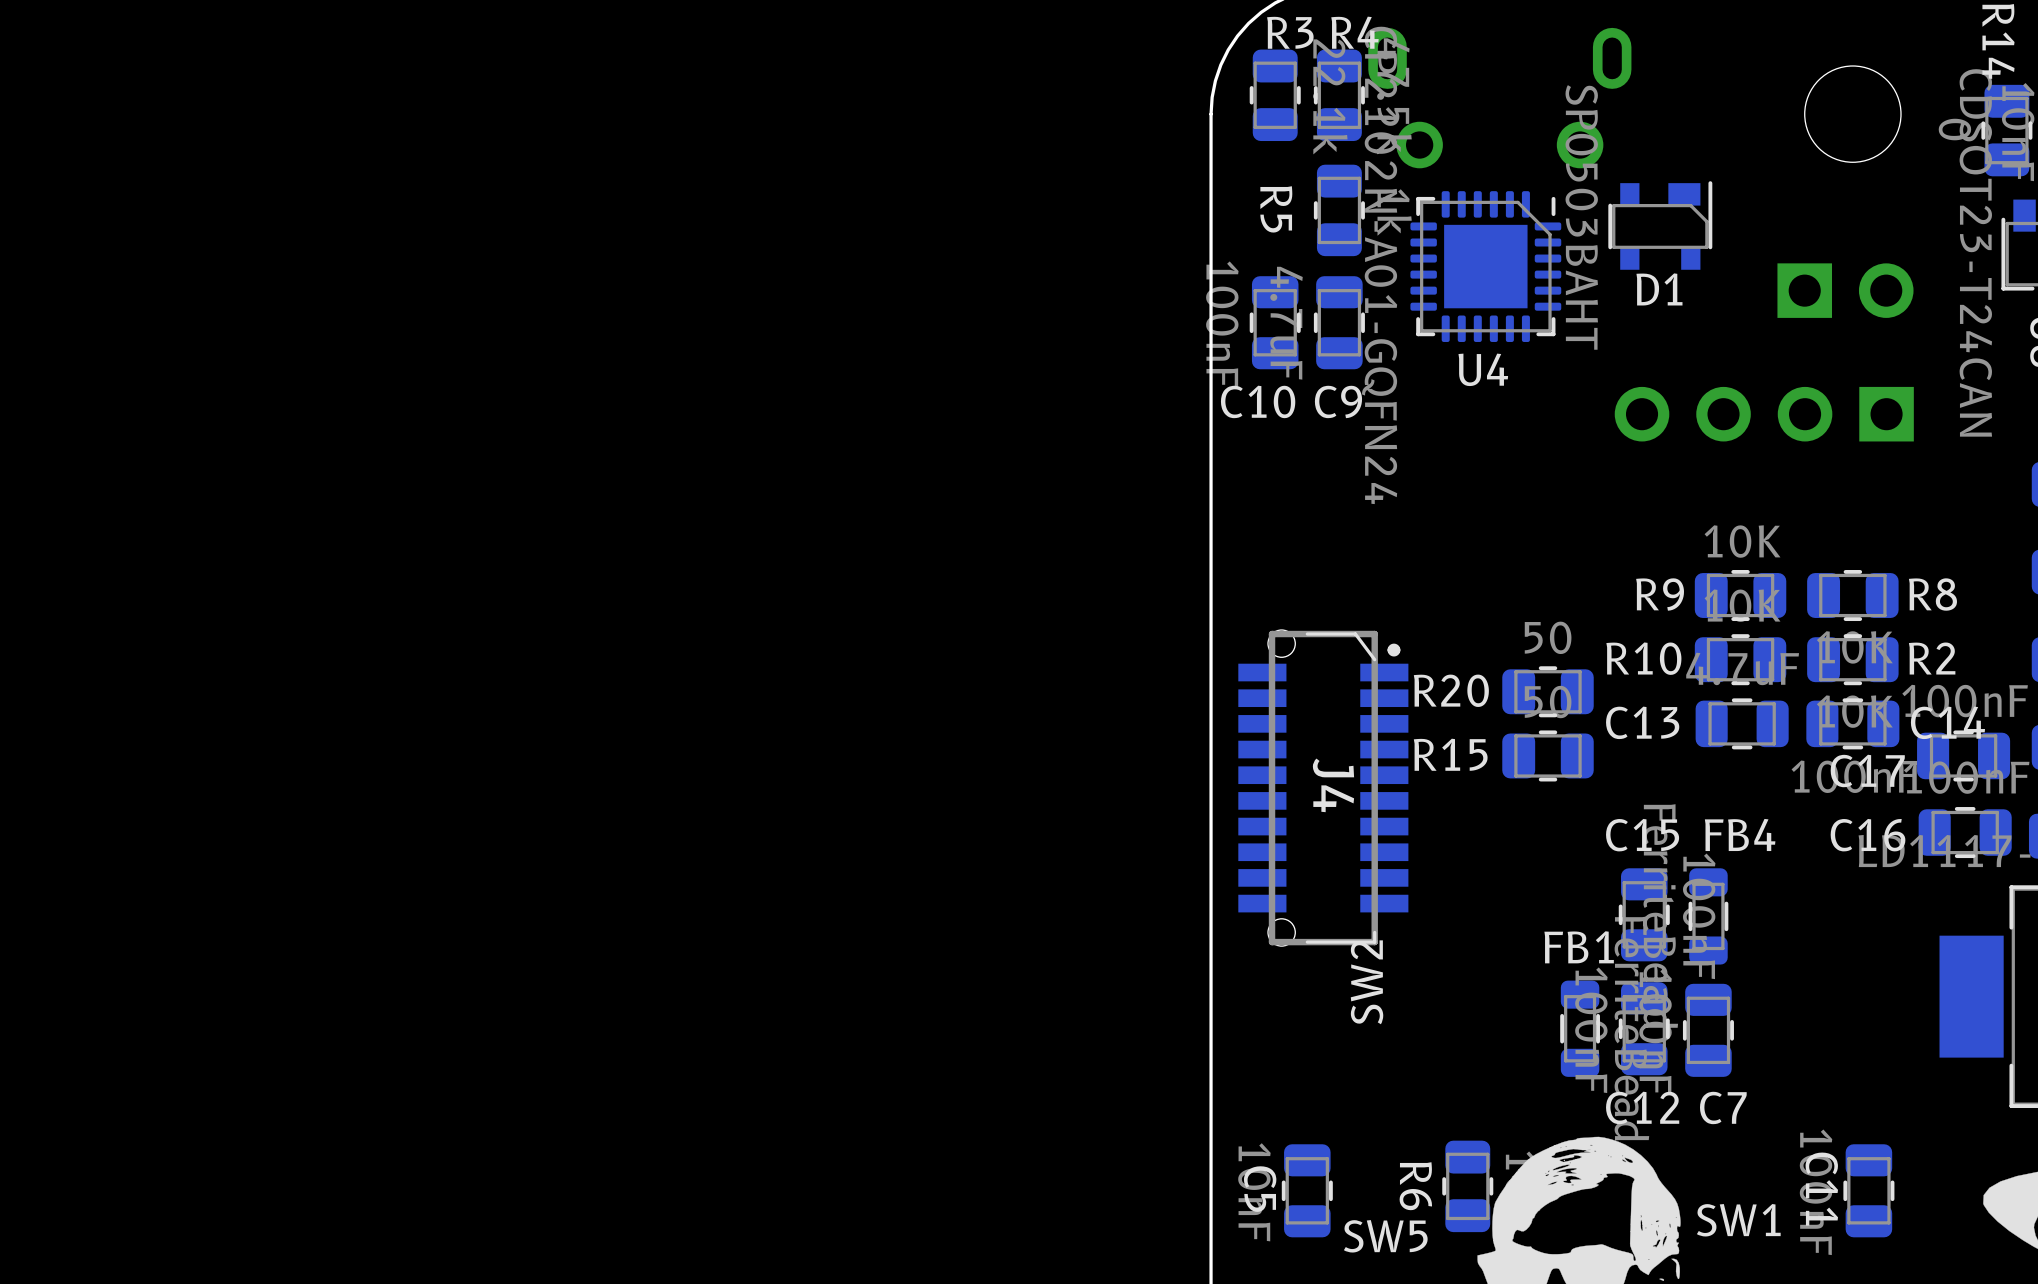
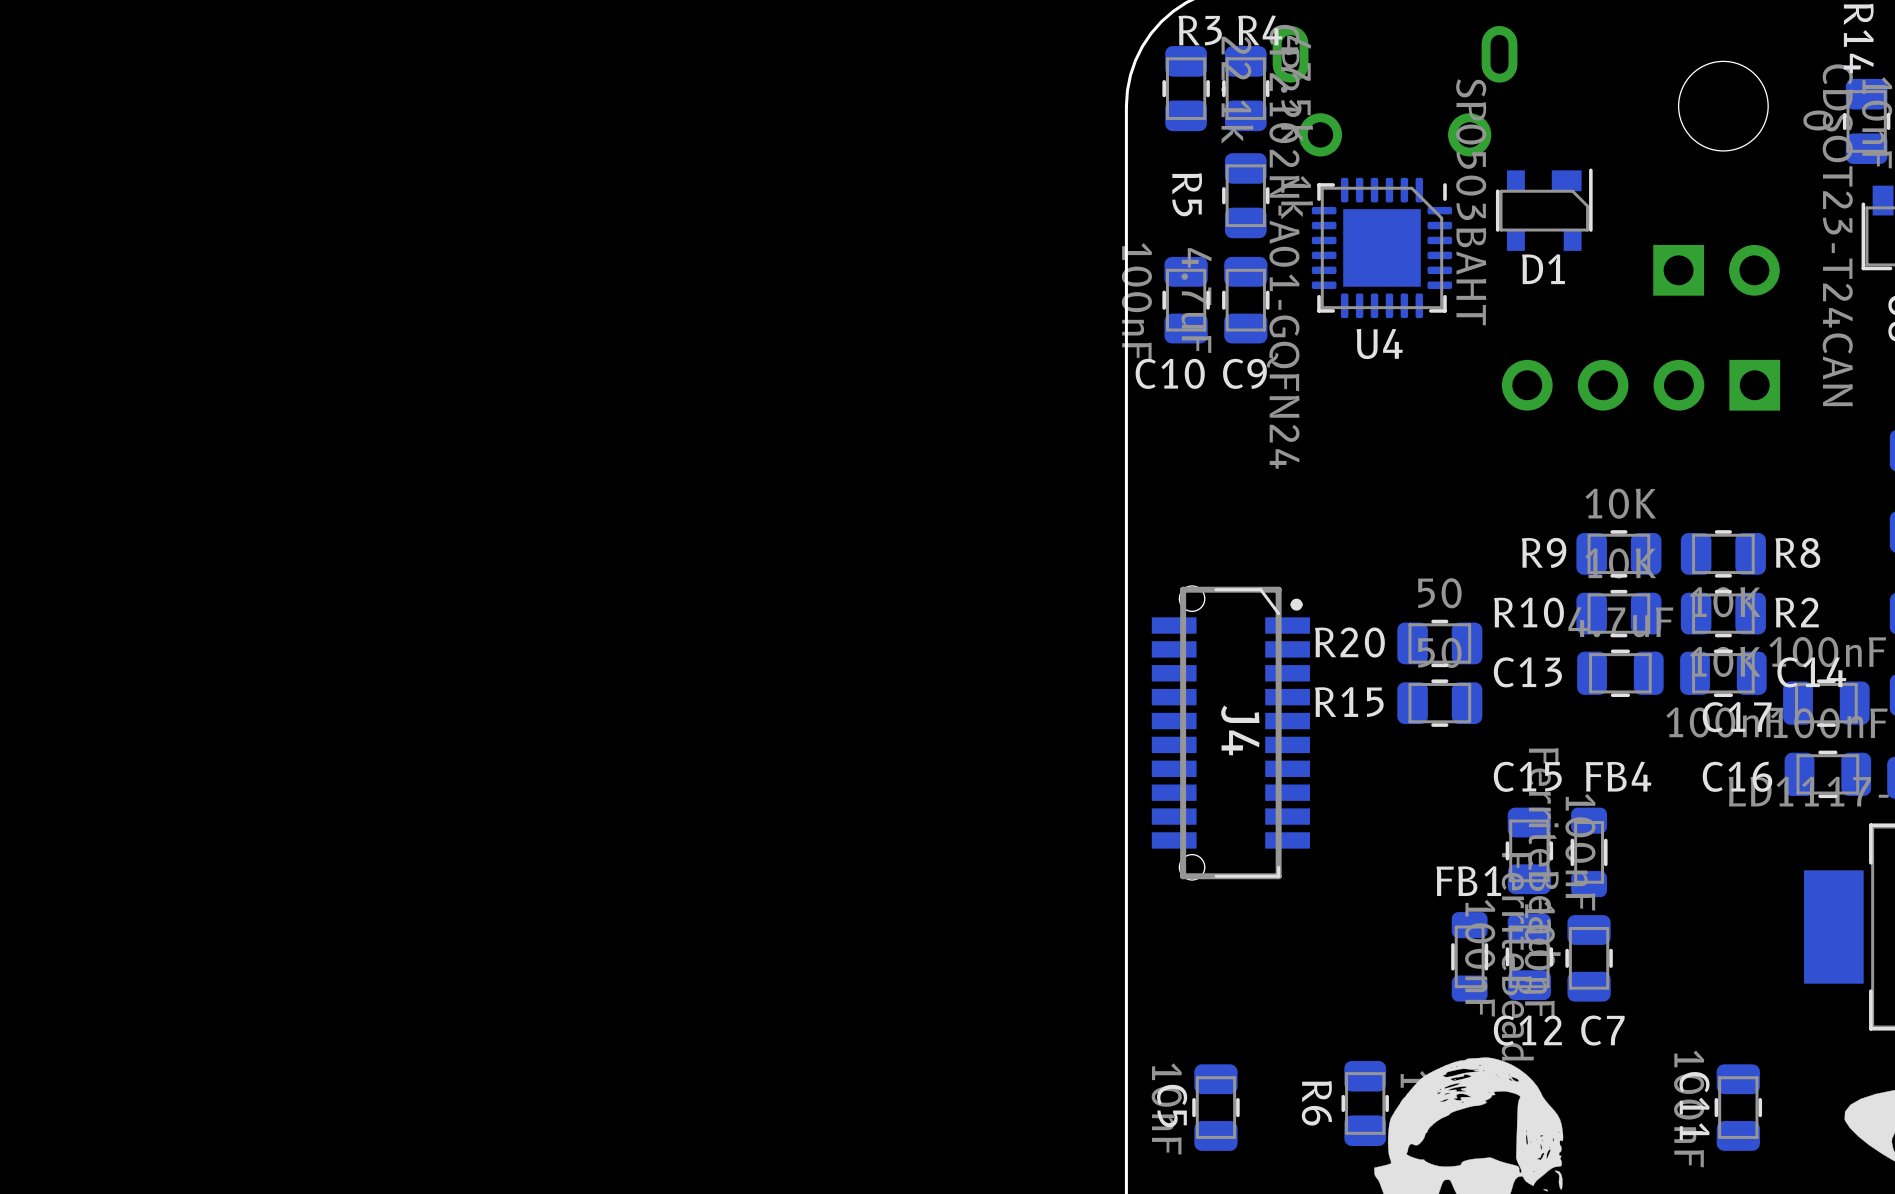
SW2: (1367, 982) -> none
SW1: (1738, 1220) -> none
SW5: (1385, 1236) -> none

